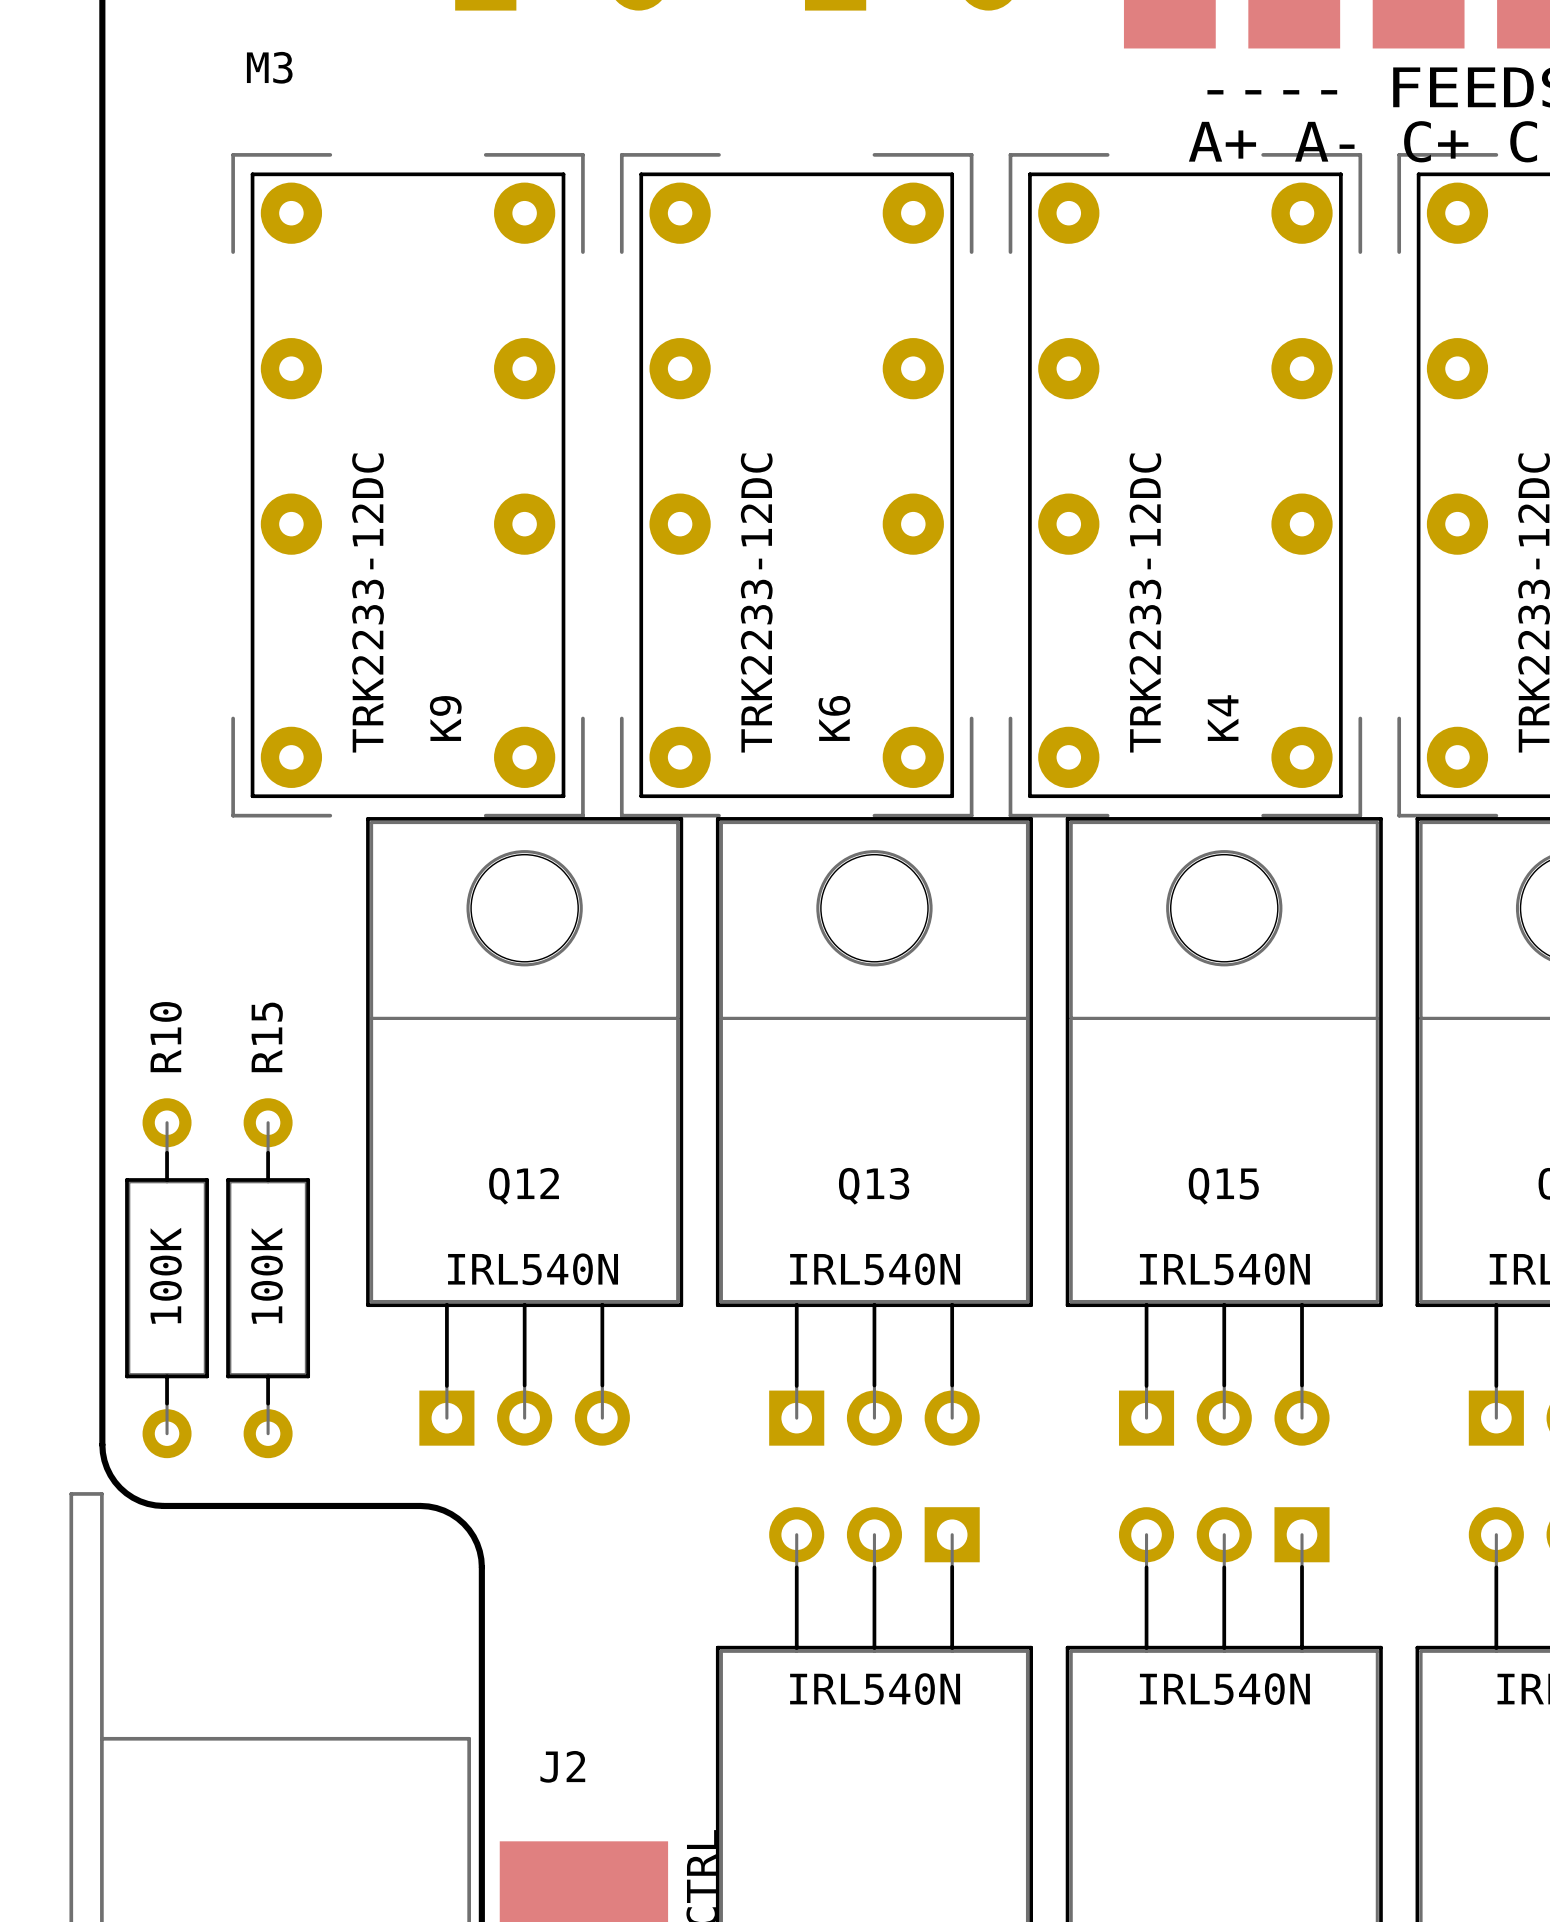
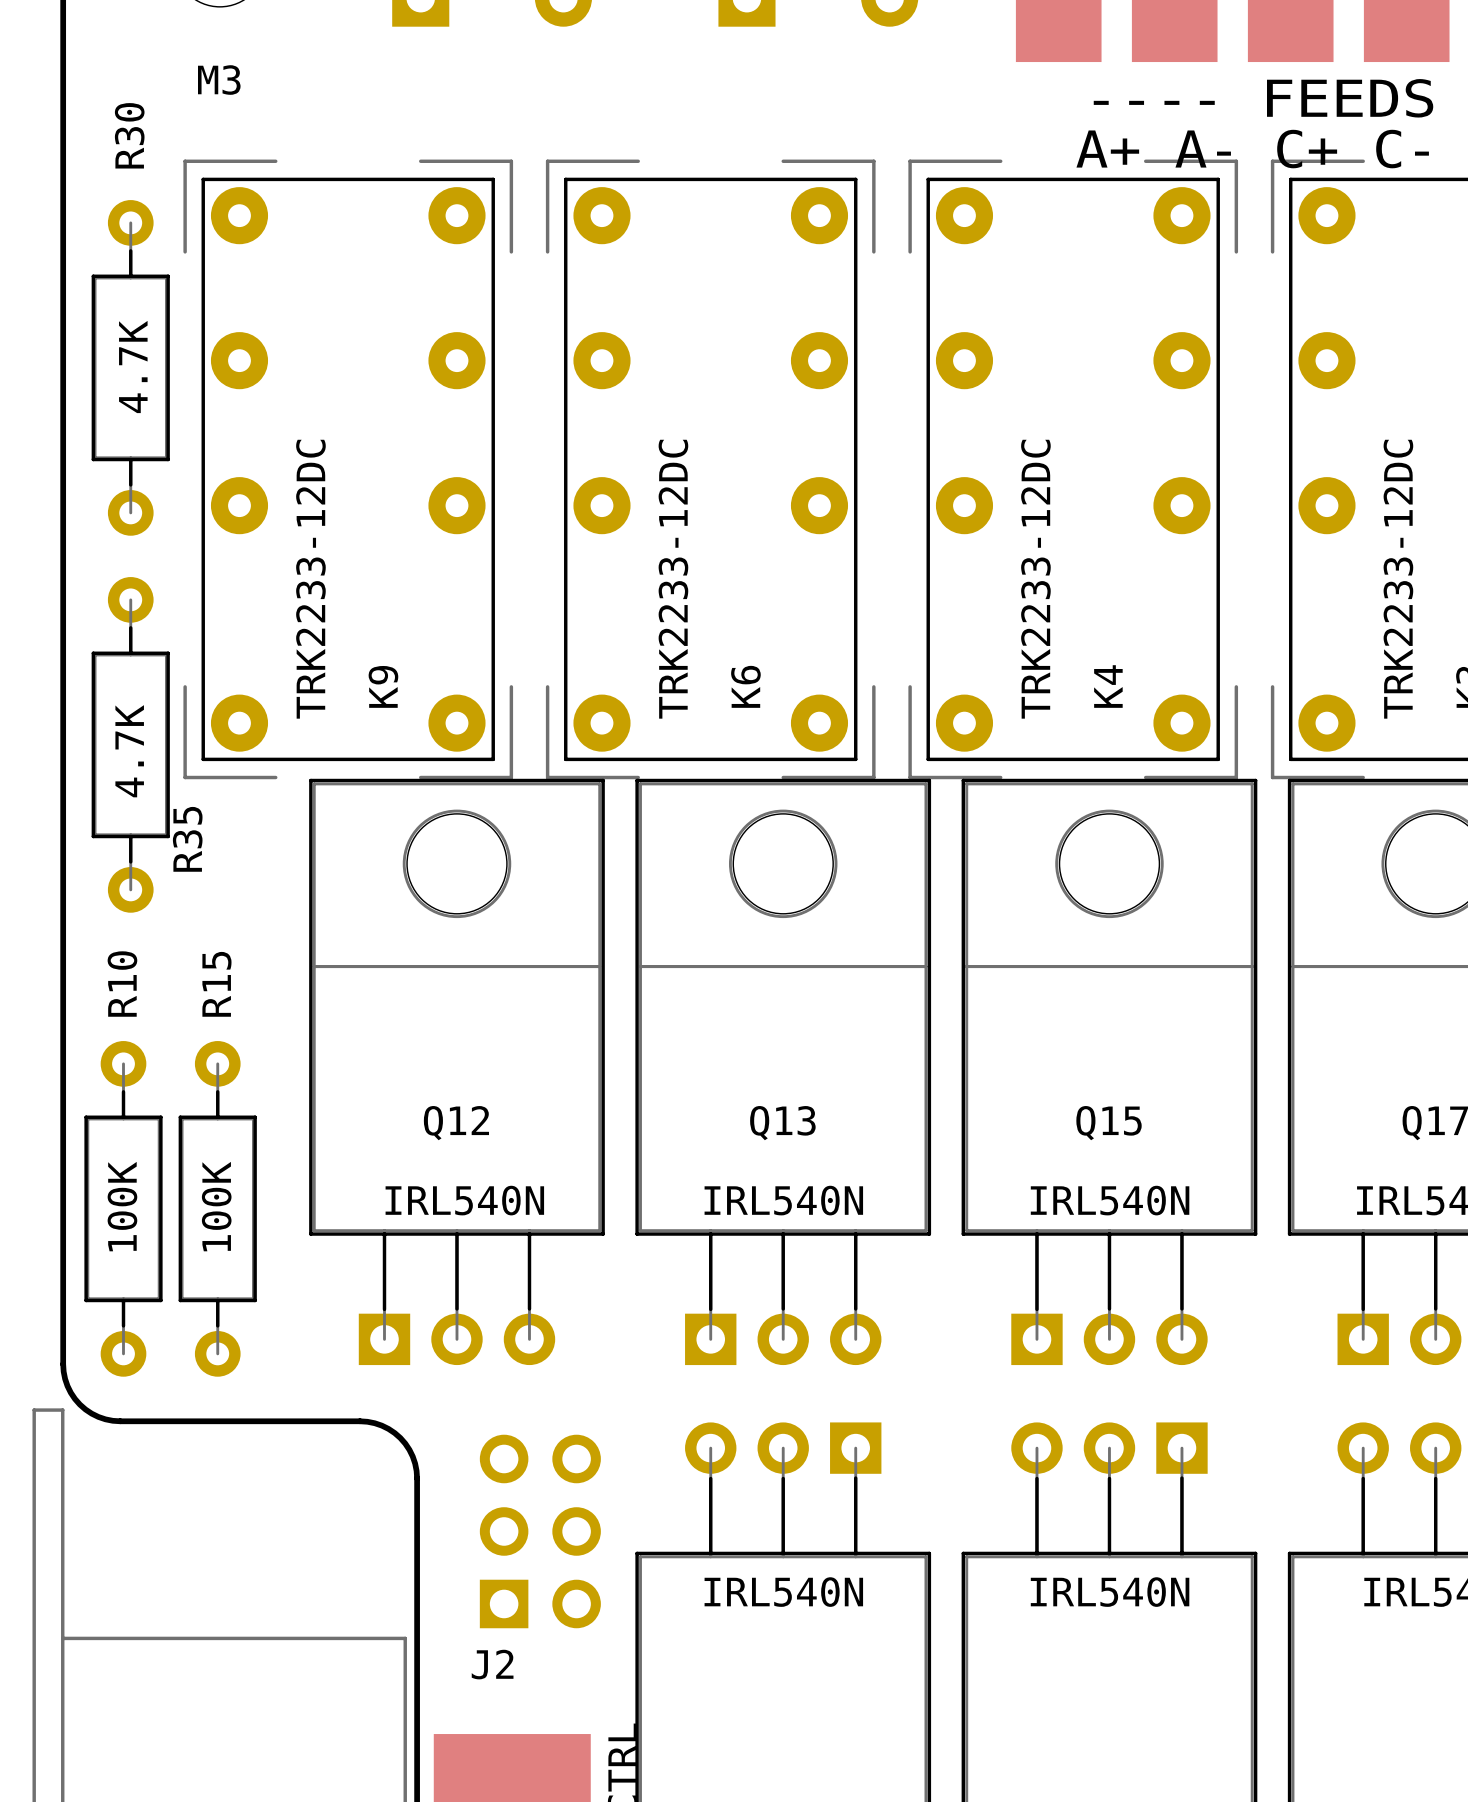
R30: none -> 4.7K (130, 367)
R35: none -> 4.7K (130, 744)
part: none -> (540, 1531)

